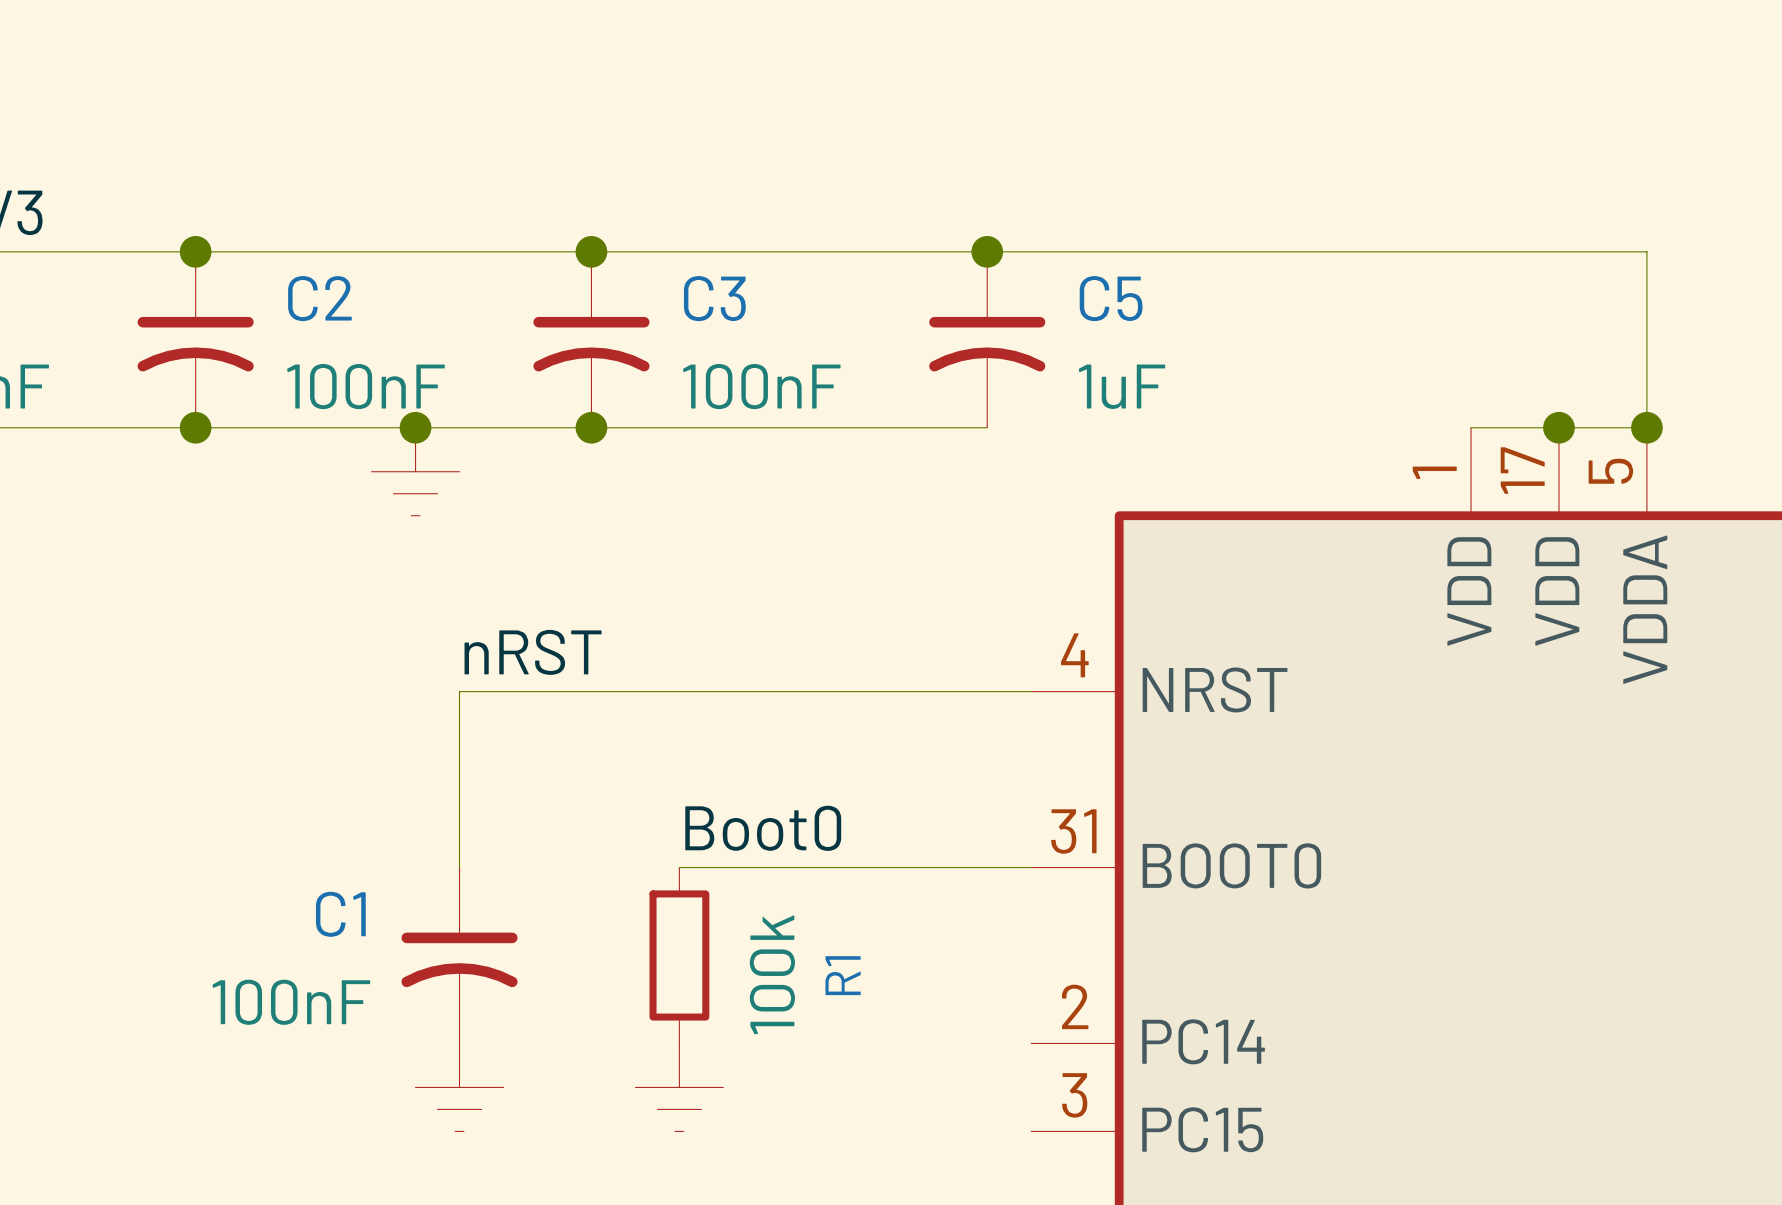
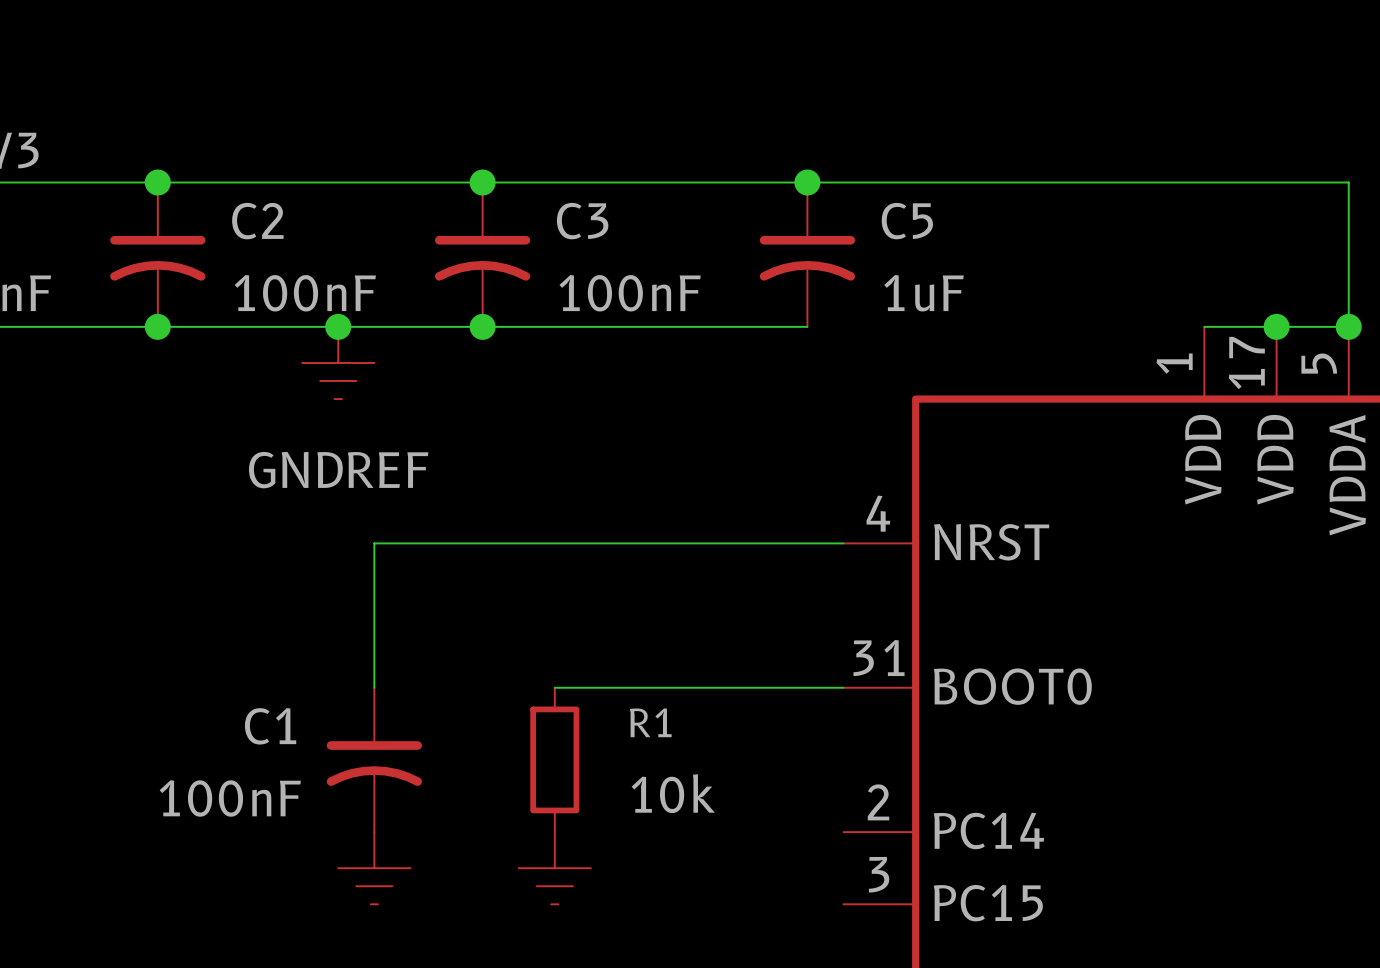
power symbol text: none -> GNDREF (338, 470)
label: nRST (533, 652) -> none
label: Boot0 (763, 828) -> none
R1 value: 100k (772, 974) -> 10k (673, 793)
R1 name rotation: 0° (843, 975) -> 90° clockwise (650, 722)

